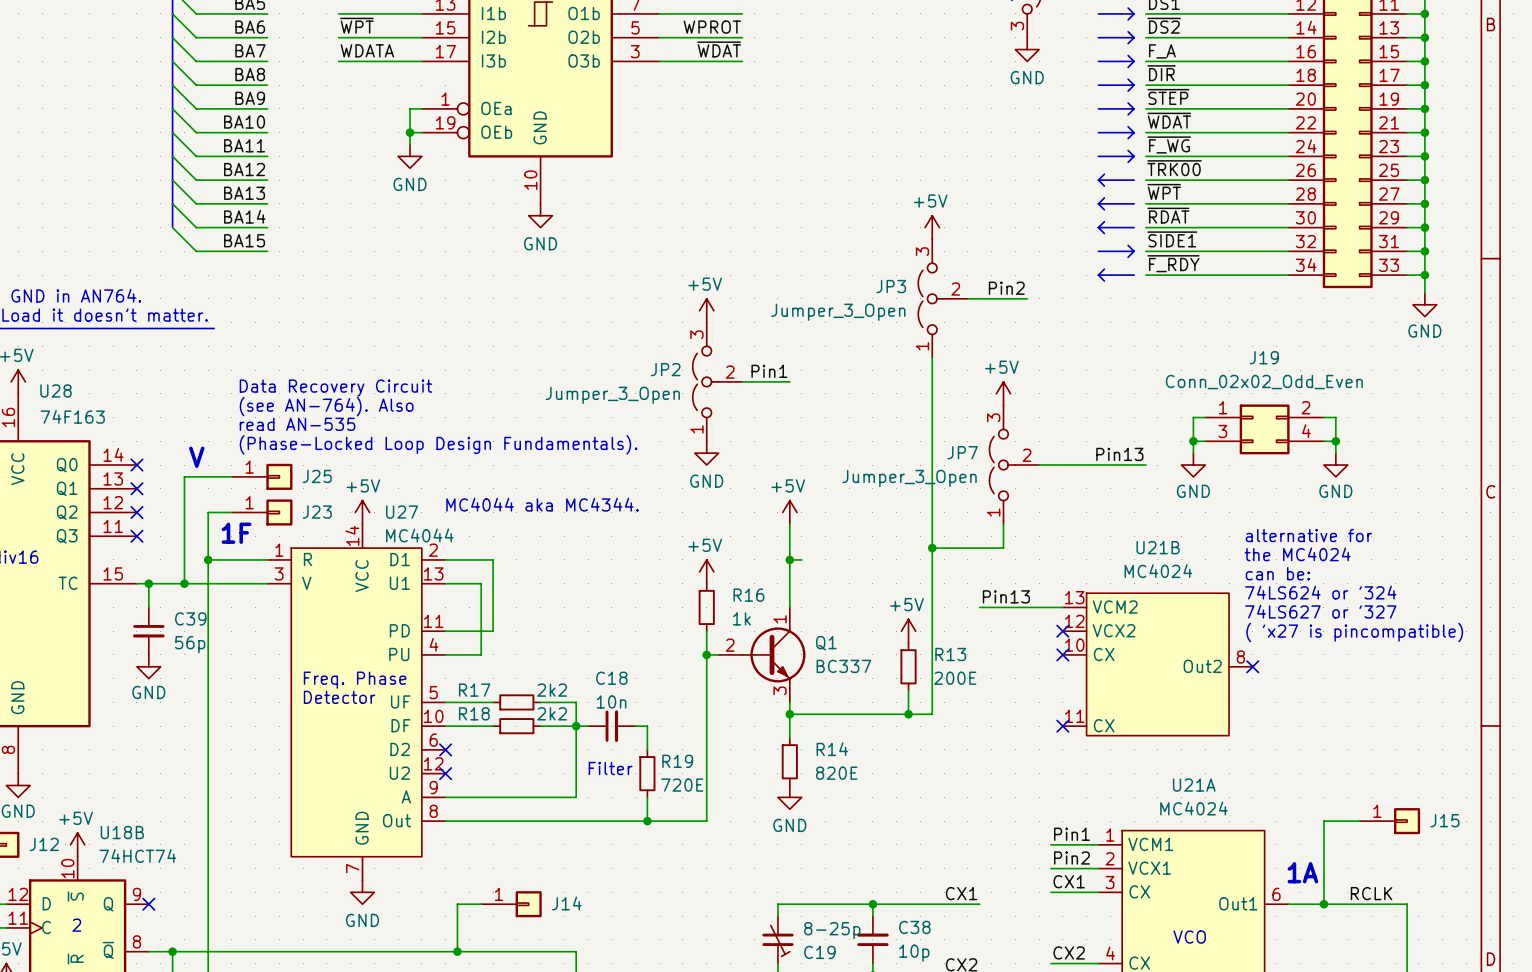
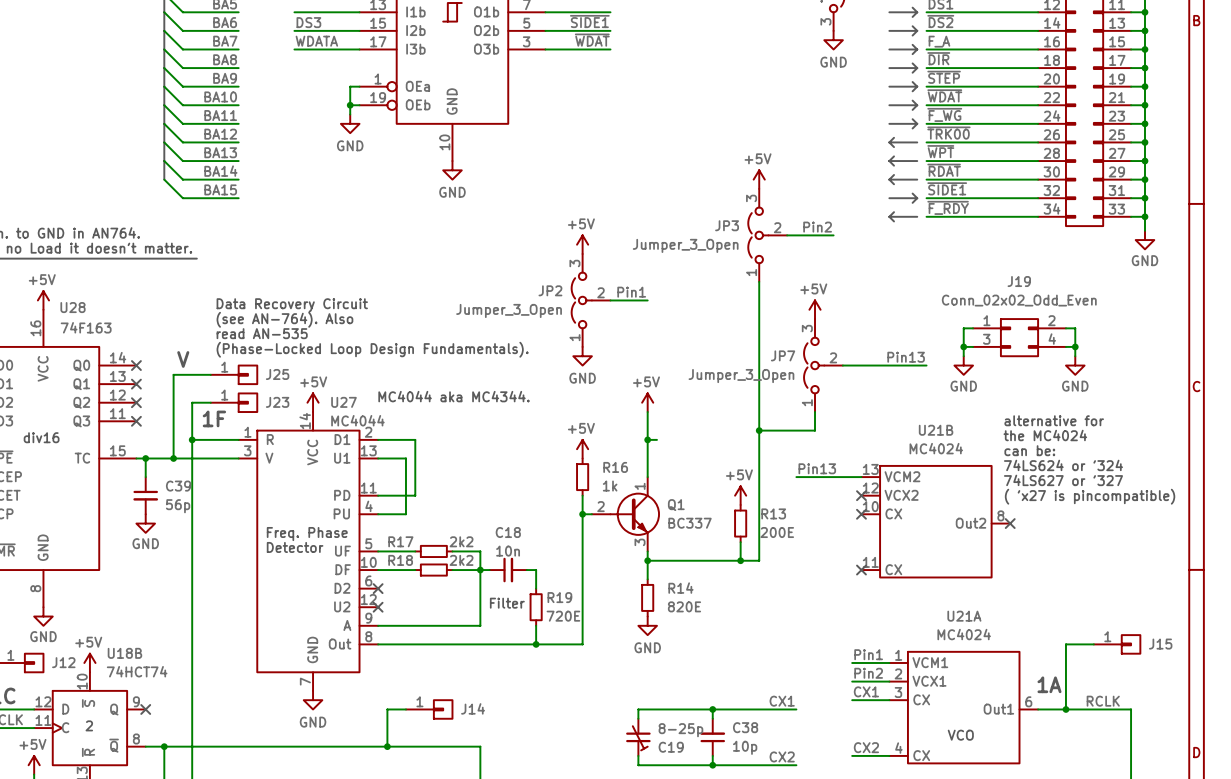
label: ~{WPT} (356, 25) -> DS3 (308, 22)
label: WPROT (712, 27) -> ~{SIDE1} (589, 21)

